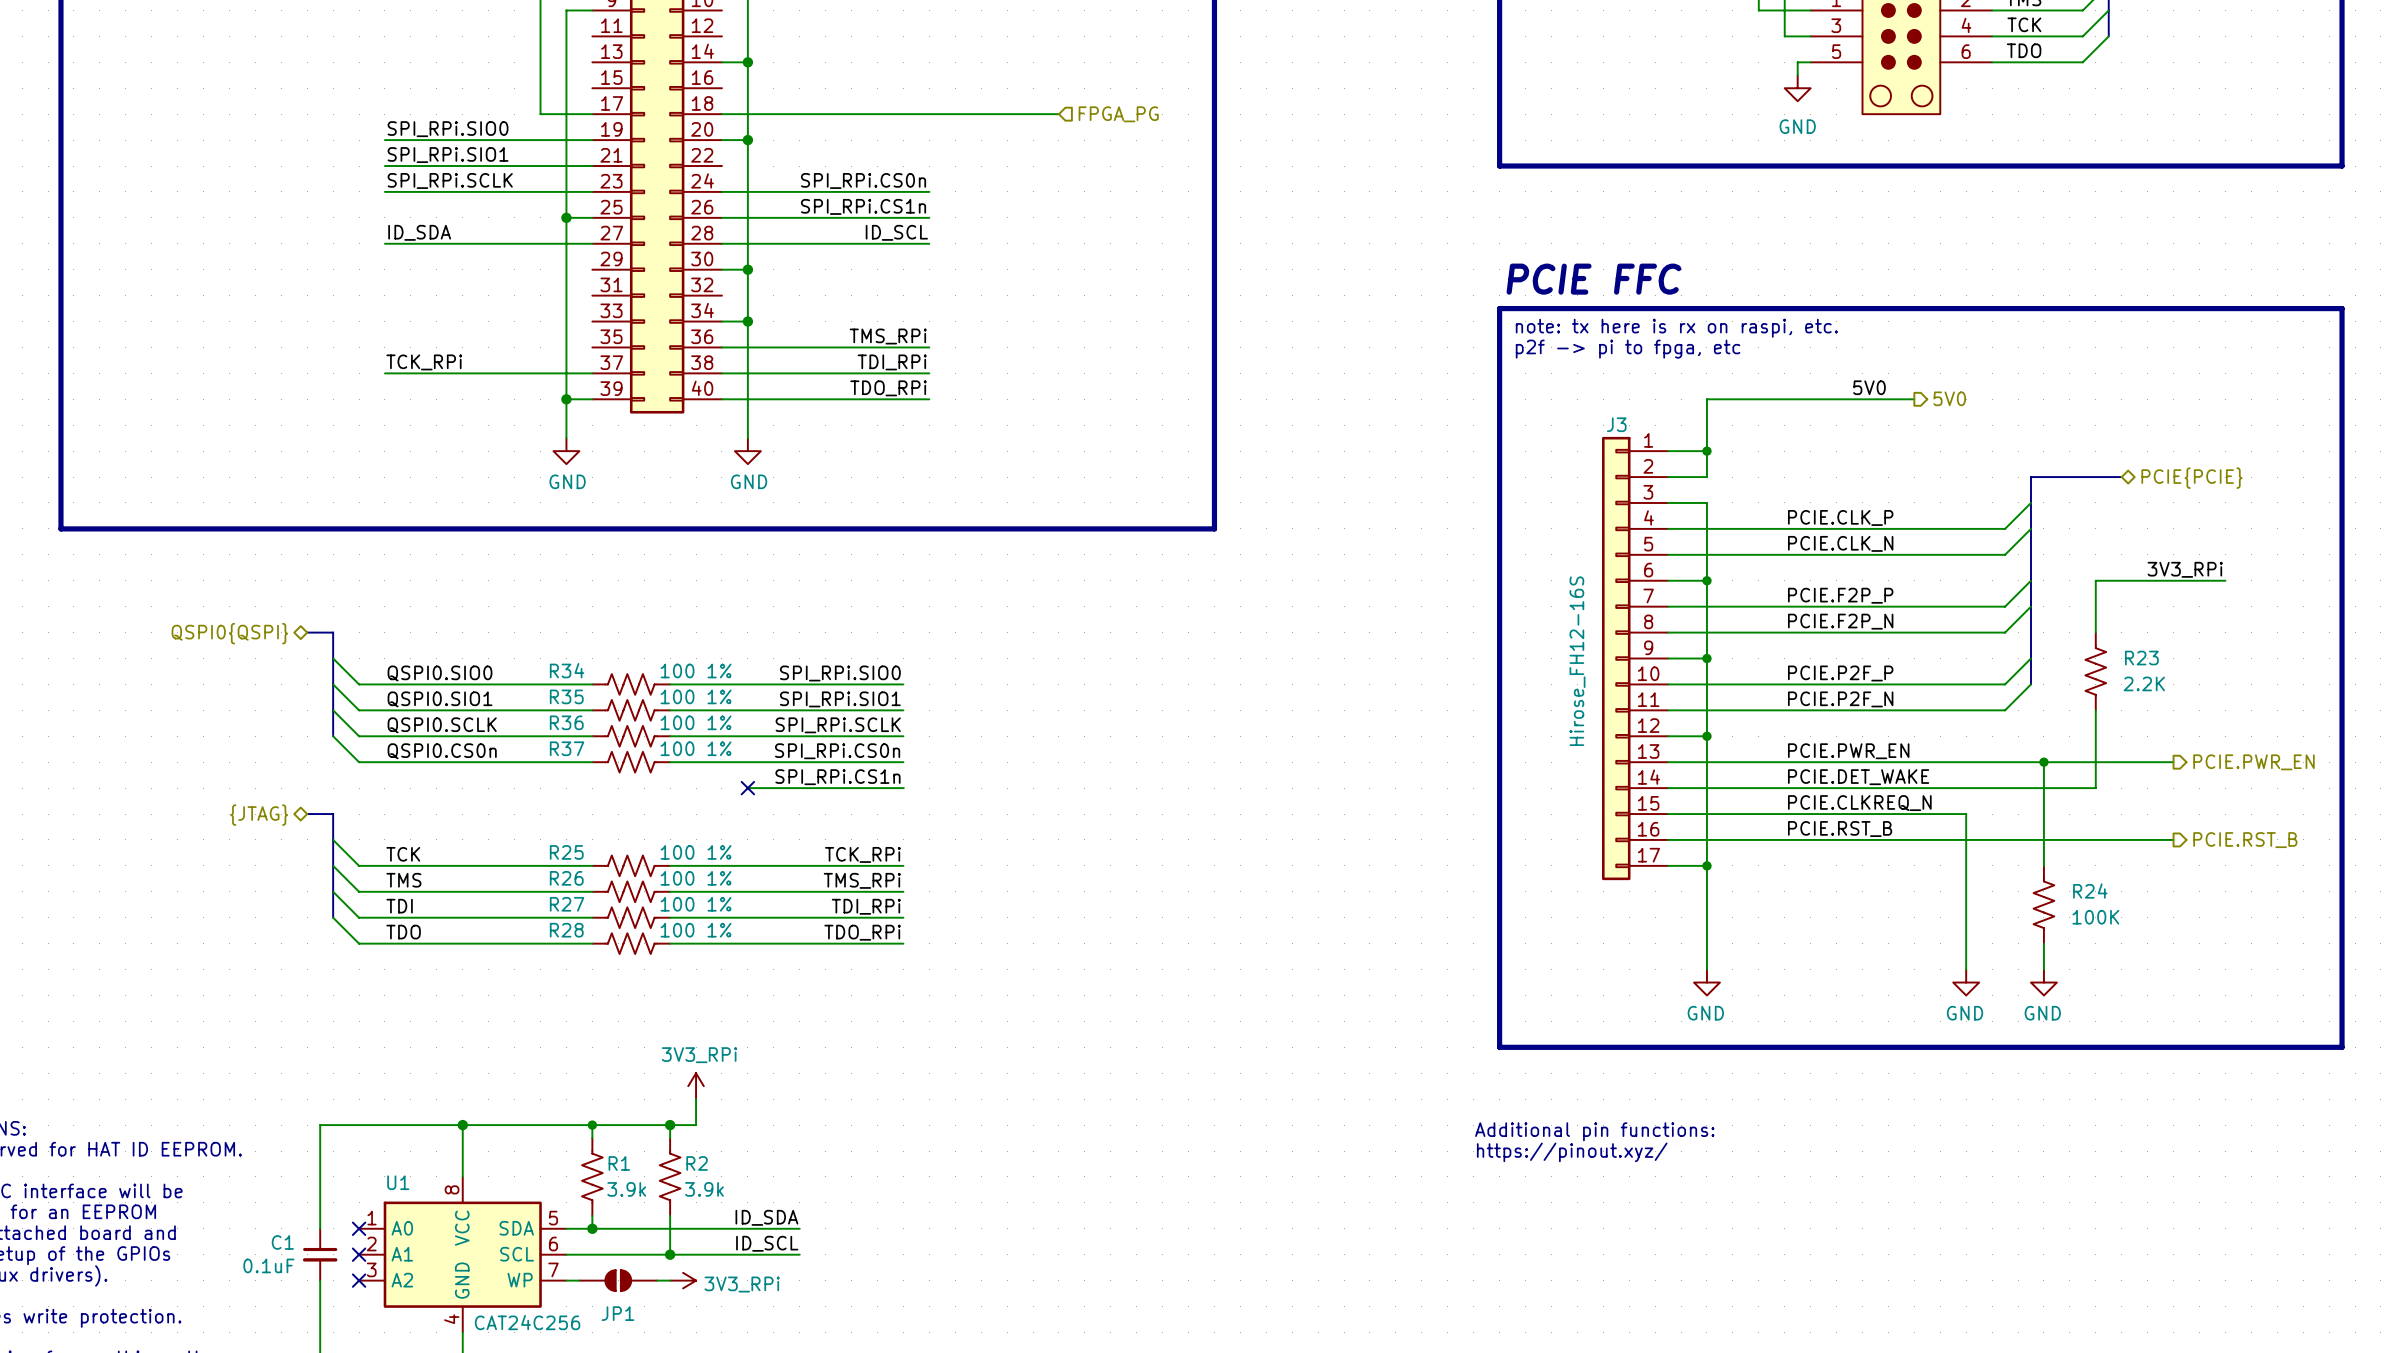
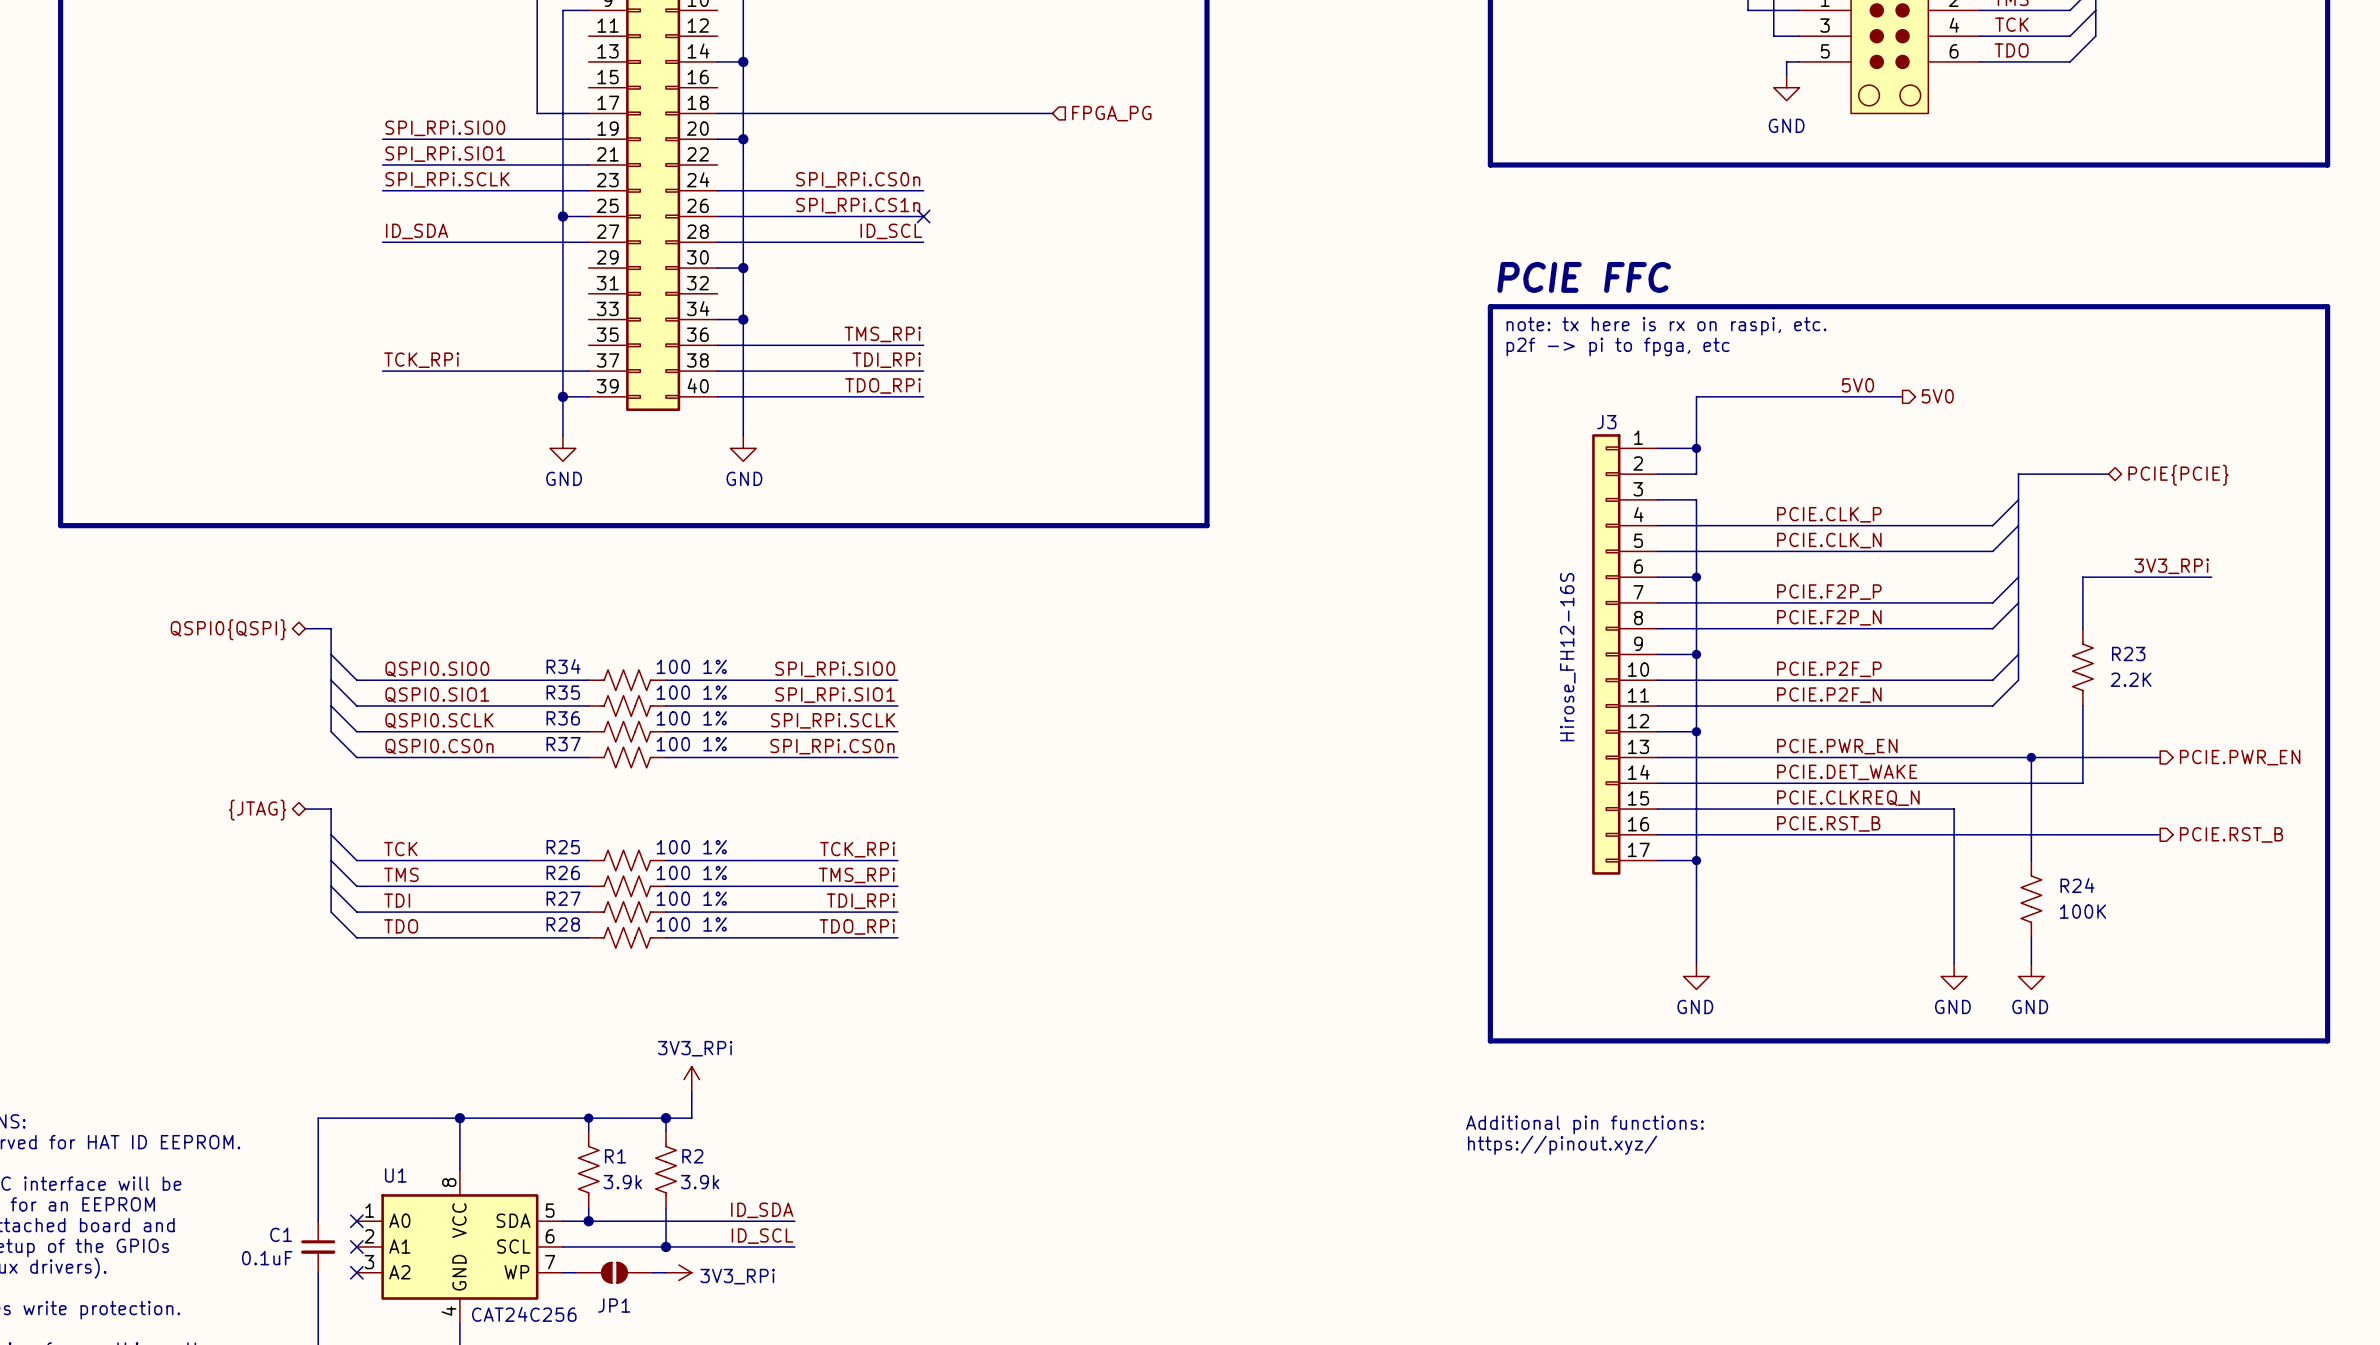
no-connect mark: none -> (923, 216)
label: SPI_RPi.CS1n (837, 777) -> none
wire: (747, 788) (903, 788) -> none
no-connect mark: (747, 788) -> none

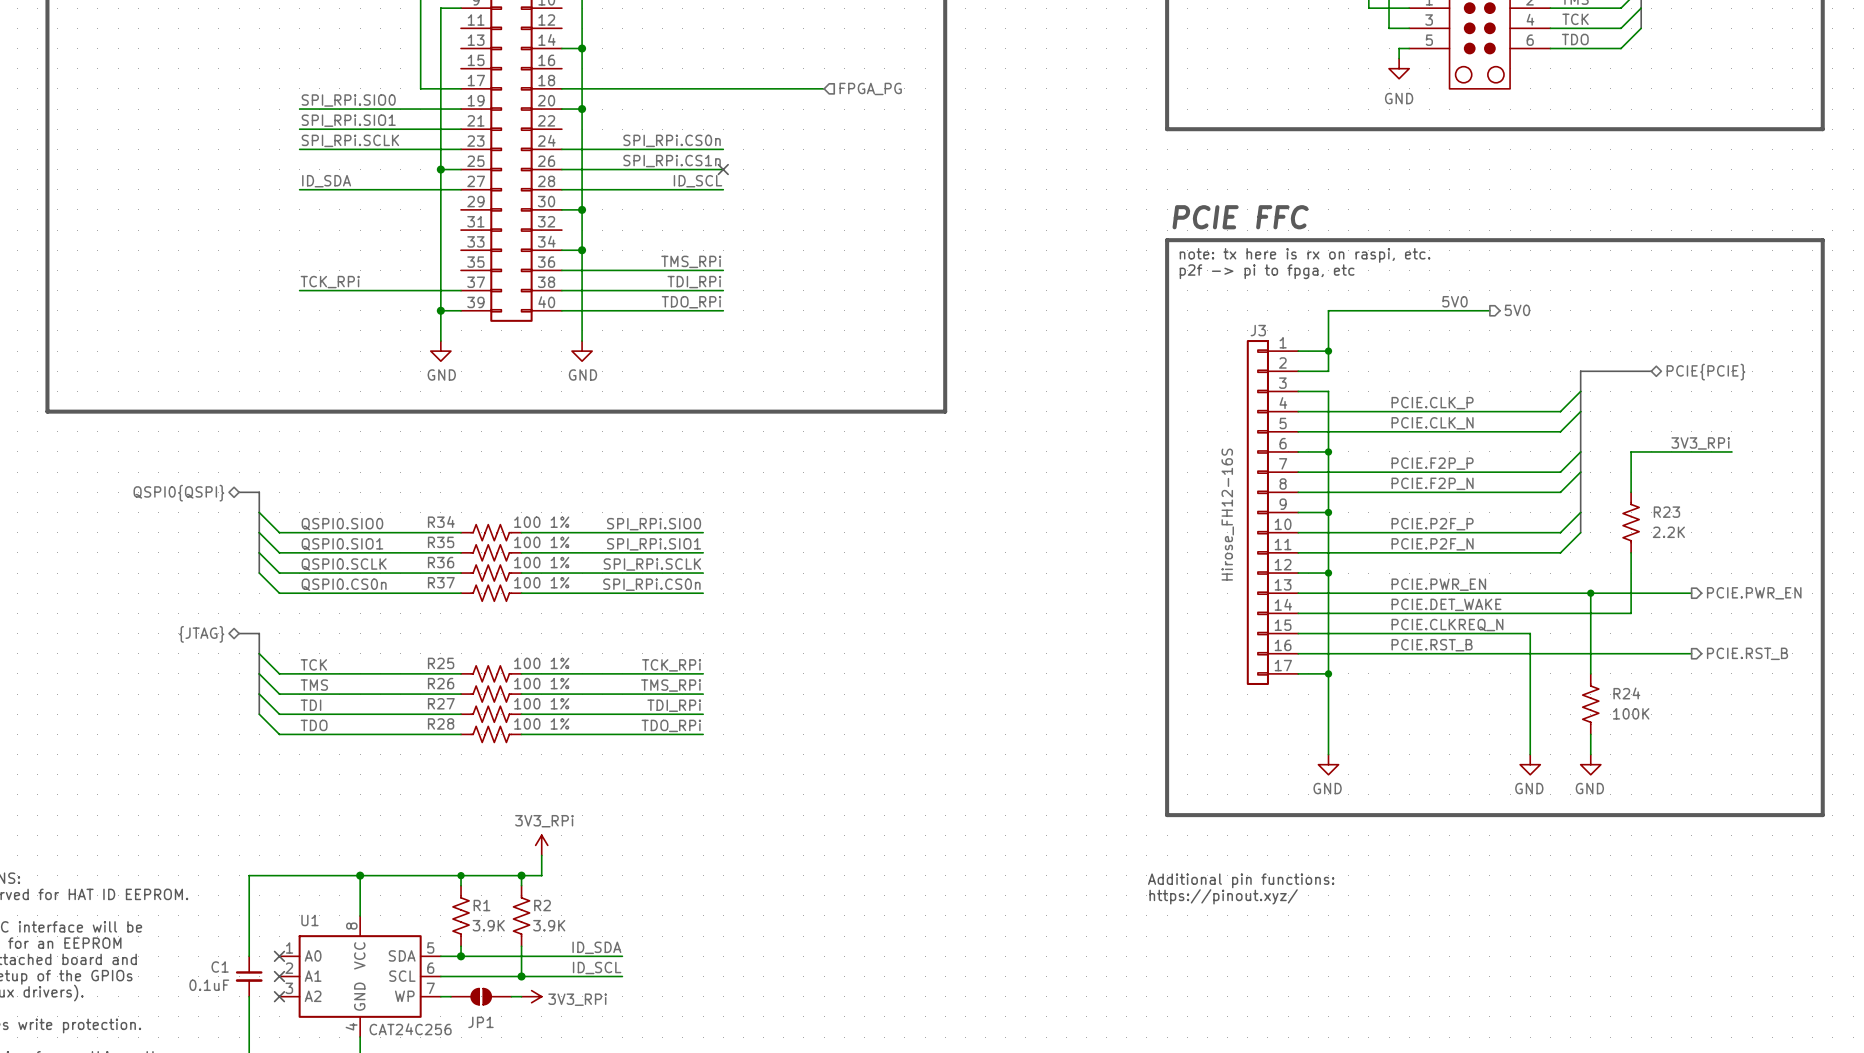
R1 value: 3.9k (622, 1182) -> 3.9K (488, 925)
R2 value: 3.9k (700, 1182) -> 3.9K (549, 925)

